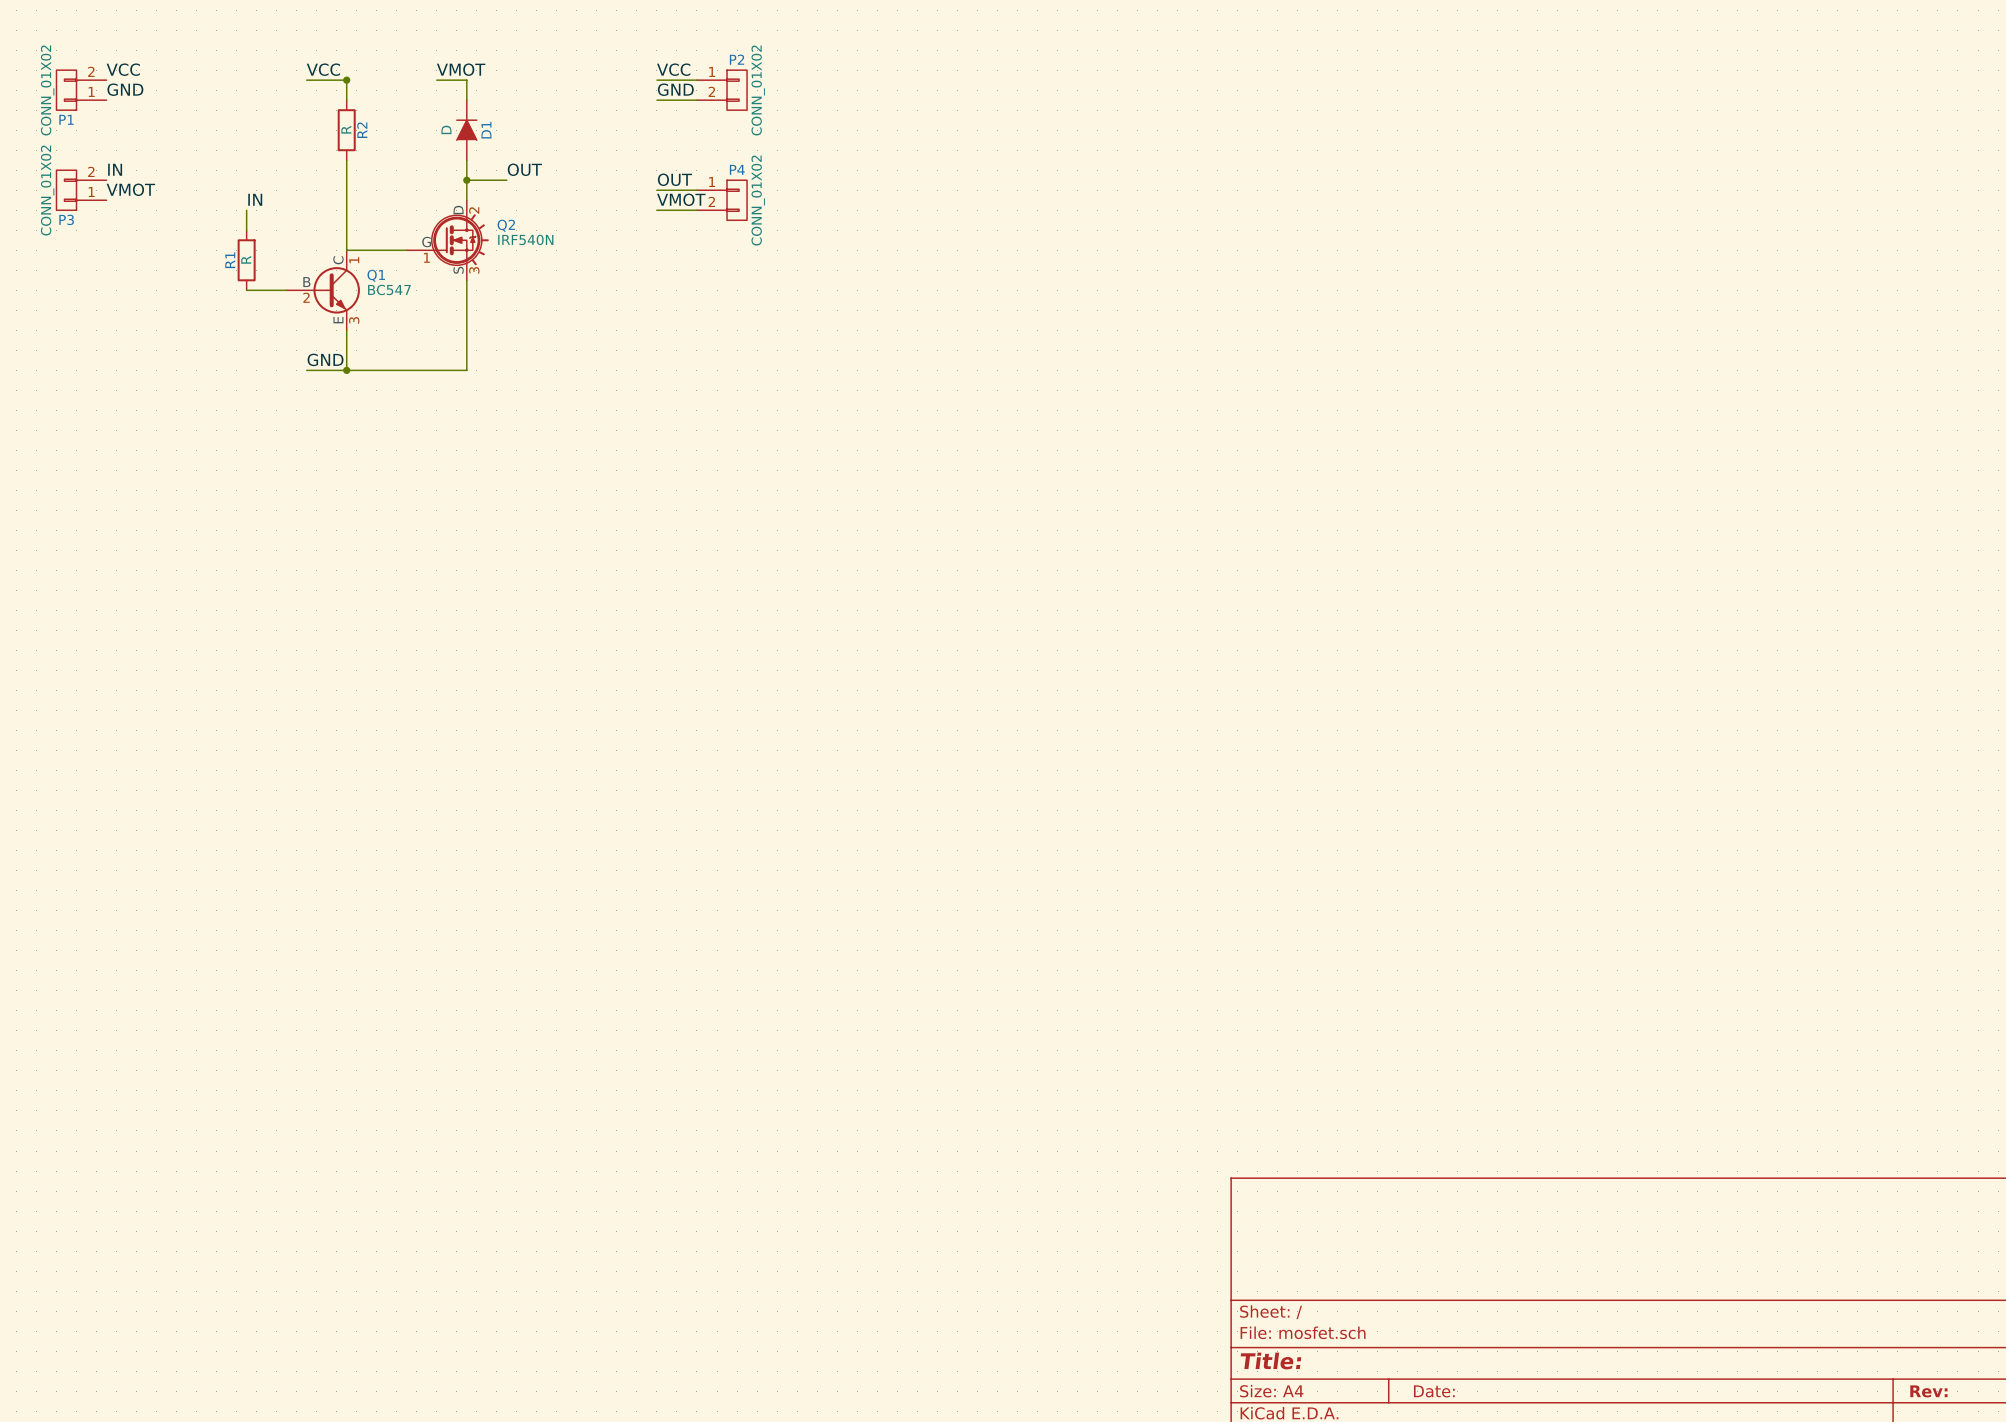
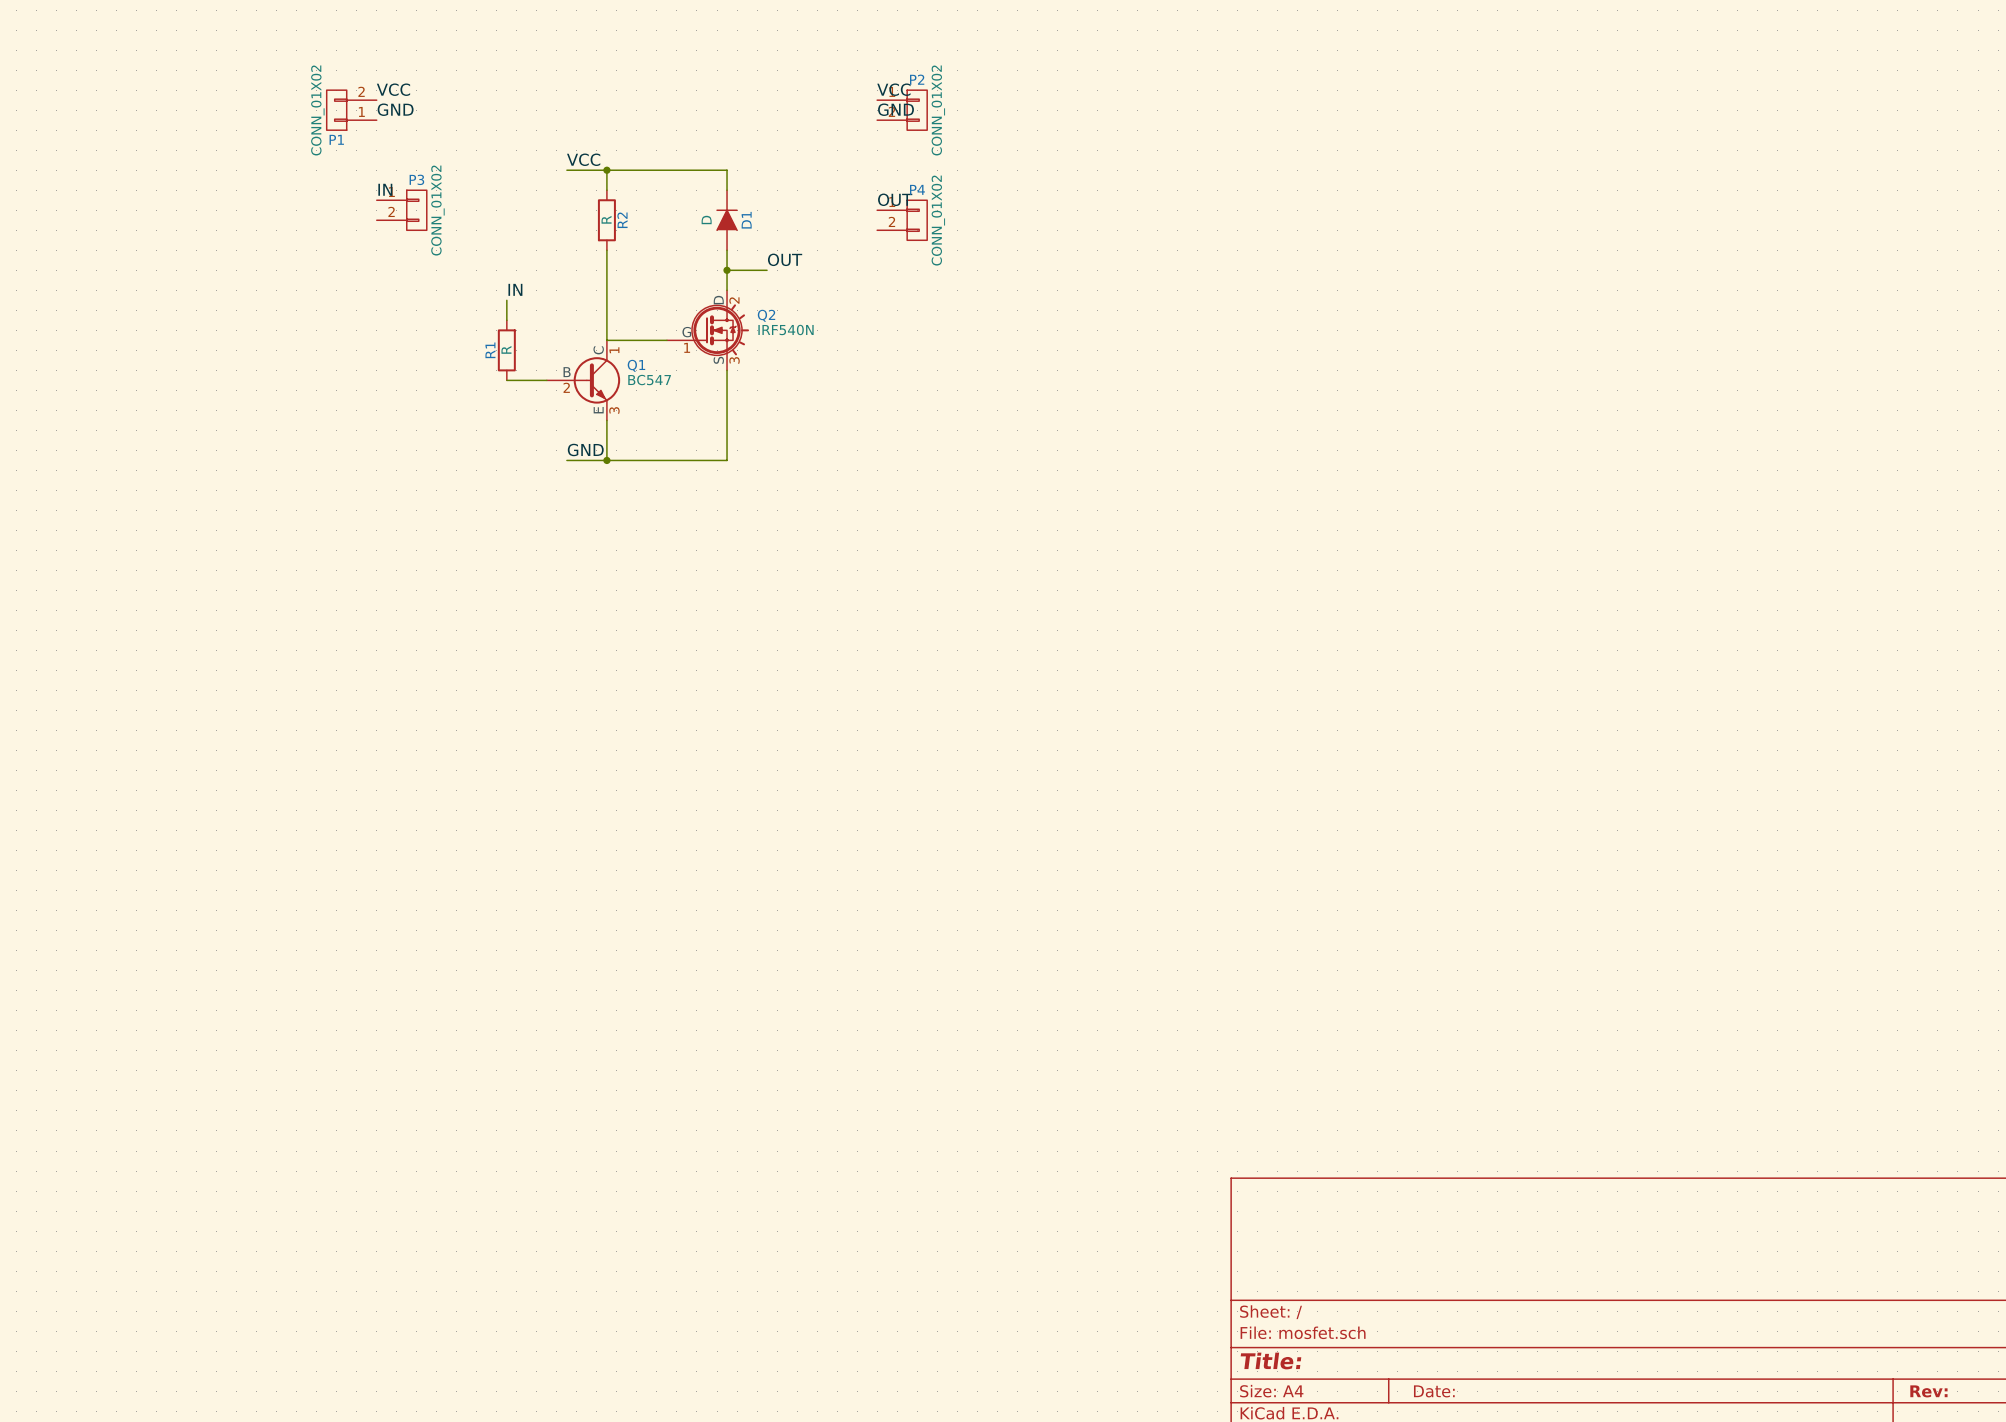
label: VCC (123, 69) -> none
label position: VCC (323, 69) -> VCC (393, 89)
label: VMOT (461, 69) -> none
label: VCC (673, 69) -> none
wire: (306, 80) (346, 80) (346, 100) -> none
junction: (346, 80) -> none
wire: (436, 80) (466, 80) (466, 100) -> none
wire: (656, 80) (696, 80) -> none
label: GND (125, 89) -> none
label: GND (675, 89) -> none
label: none -> VCC (893, 89)
P1 position: (81, 90) -> (351, 110)
P2 position: (722, 90) -> (902, 110)
wire: (656, 100) (696, 100) -> none
label: none -> GND (395, 109)
label: none -> GND (895, 109)
R2 position: (346, 130) -> (606, 220)
D1 position: (466, 130) -> (727, 220)
label: none -> VCC (583, 159)
wire: (346, 160) (346, 250) (406, 250) -> none
wire: (466, 160) (466, 200) -> none
label: IN (115, 169) -> none
label: OUT (524, 169) -> none
wire: none -> (566, 170) (727, 170) (727, 190)
wire: none -> (606, 170) (606, 190)
junction: none -> (606, 170)
label: OUT (674, 179) -> none
wire: (466, 180) (506, 180) -> none
junction: (466, 180) -> none
label: VMOT (130, 189) -> none
P3 rotation: 0° (66, 190) -> 180° (416, 210)
P3 position: (81, 190) -> (401, 210)
wire: (656, 190) (696, 190) -> none
label position: IN (255, 199) -> IN (385, 189)
label: VMOT (681, 199) -> none
label: none -> OUT (895, 199)
P4 position: (722, 200) -> (902, 220)
wire: (246, 210) (246, 230) -> none
wire: (656, 210) (696, 210) -> (727, 270) (767, 270)
Q2 position: (447, 240) -> (708, 330)
wire: none -> (606, 250) (606, 340) (666, 340)
wire: none -> (727, 250) (727, 290)
label: none -> OUT (785, 259)
R1 position: (246, 260) -> (506, 350)
junction: none -> (727, 270)
wire: (466, 280) (466, 370) (306, 370) -> none
label: none -> IN (515, 289)
wire: (246, 290) (286, 290) -> none
Q1 position: (323, 290) -> (583, 380)
wire: none -> (506, 300) (506, 320)
wire: (346, 330) (346, 370) -> none
label: GND (325, 359) -> none
junction: (346, 370) -> none
wire: none -> (727, 370) (727, 460) (566, 460)
wire: none -> (506, 380) (546, 380)
wire: none -> (606, 420) (606, 460)
label: none -> GND (585, 449)
junction: none -> (606, 460)

